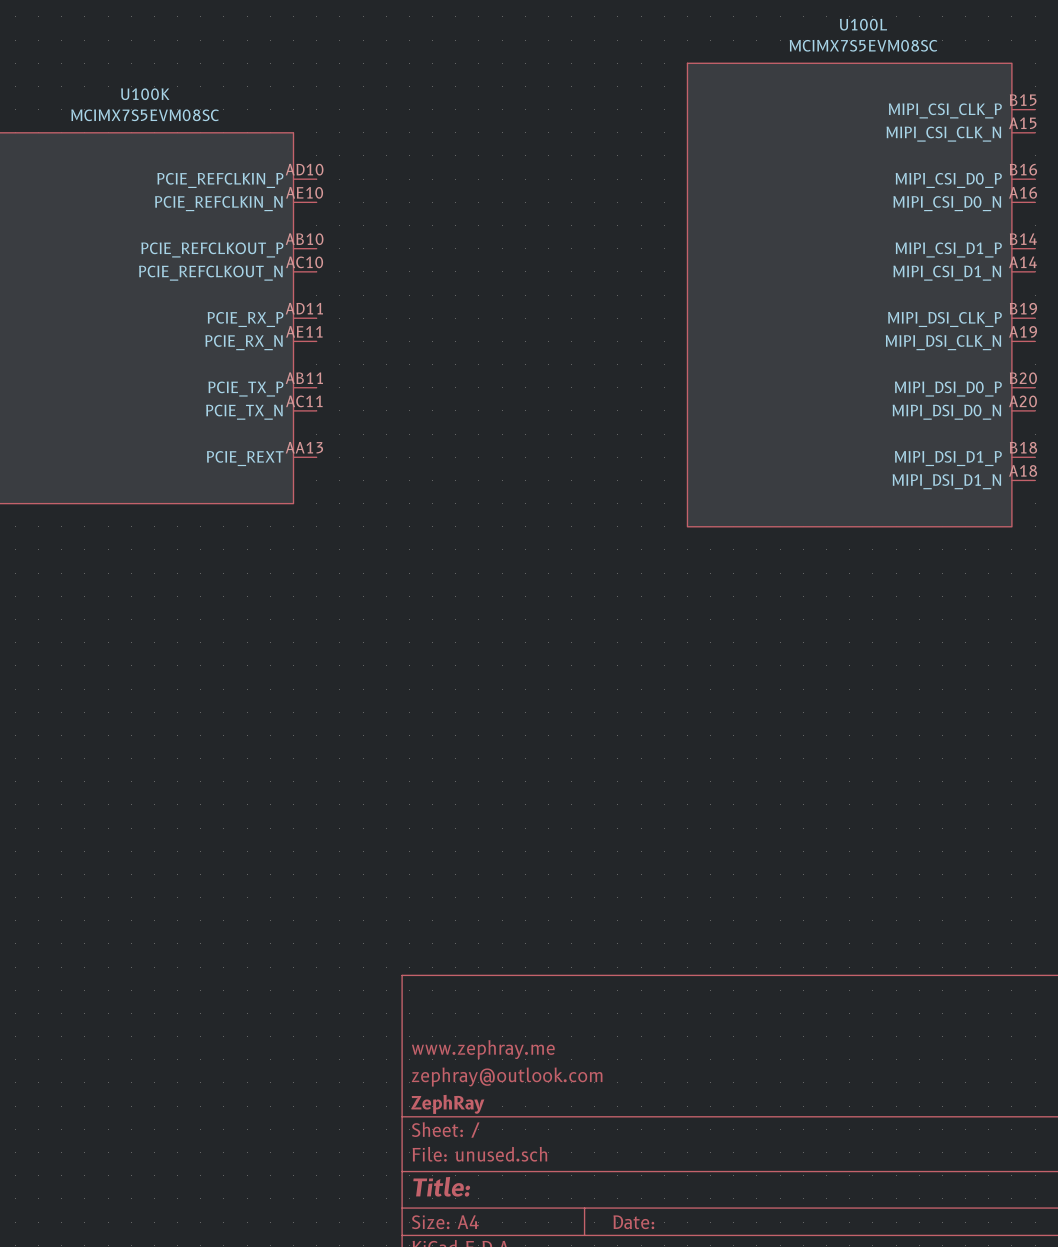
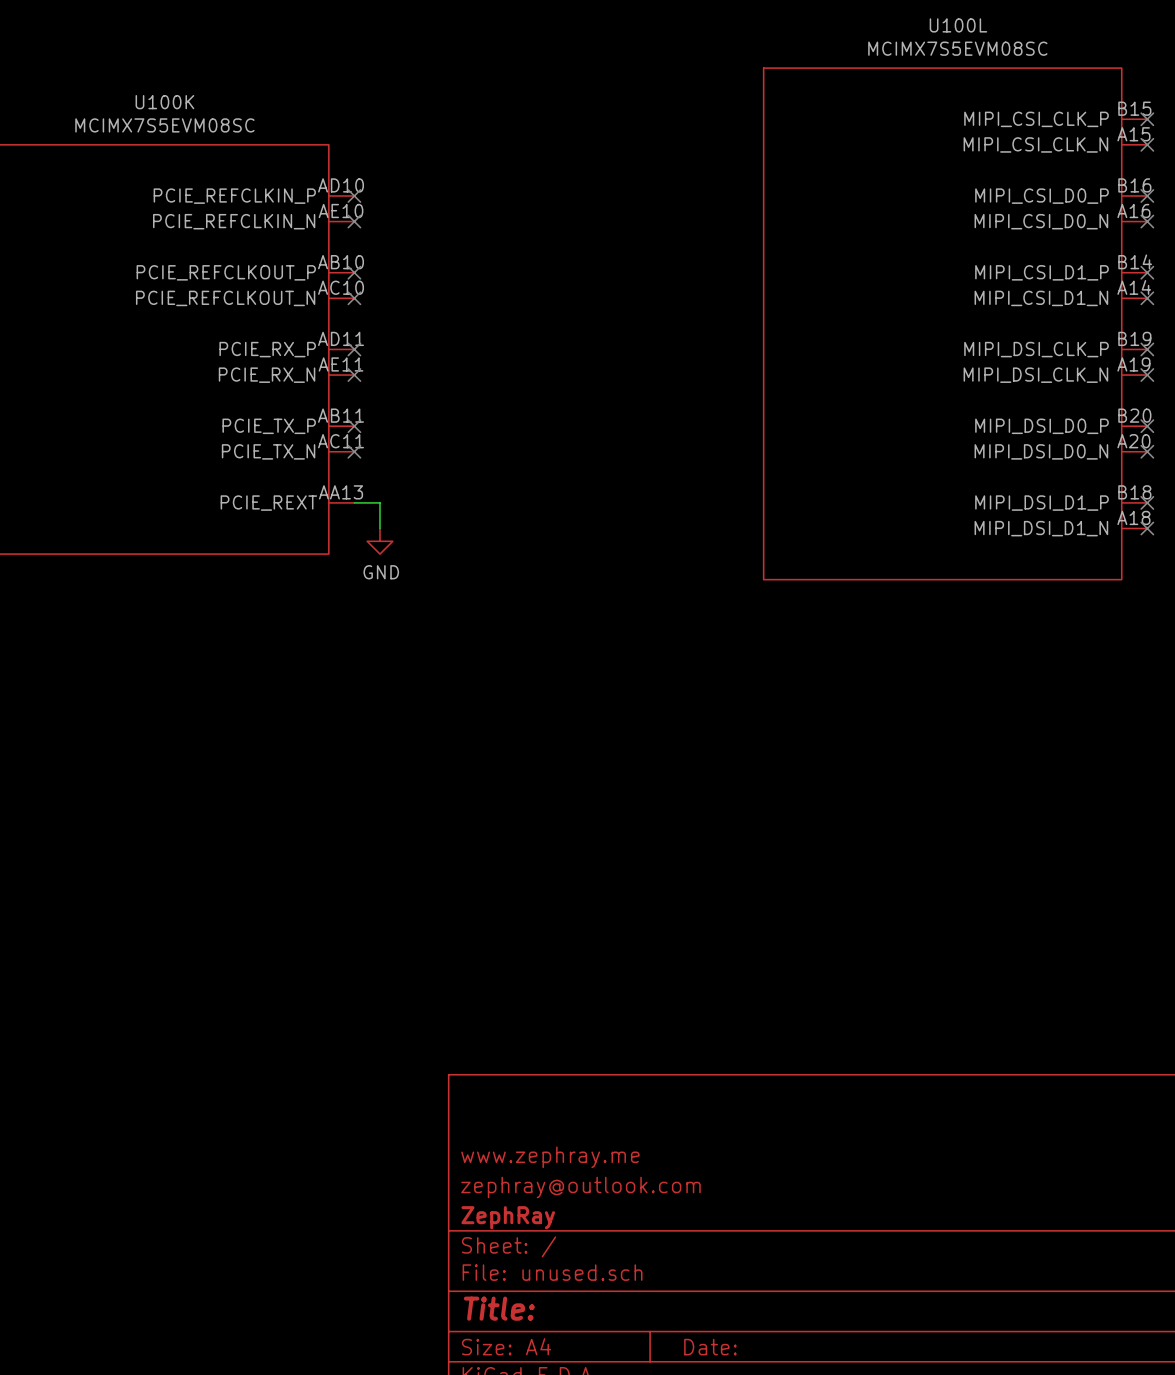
no-connect mark: none -> (1147, 119)
no-connect mark: none -> (1147, 144)
no-connect mark: none -> (354, 195)
no-connect mark: none -> (1147, 195)
no-connect mark: none -> (354, 221)
no-connect mark: none -> (1147, 221)
no-connect mark: none -> (354, 272)
no-connect mark: none -> (1147, 272)
no-connect mark: none -> (354, 298)
no-connect mark: none -> (1147, 298)
no-connect mark: none -> (354, 349)
no-connect mark: none -> (1147, 349)
no-connect mark: none -> (354, 375)
no-connect mark: none -> (1147, 375)
no-connect mark: none -> (354, 426)
no-connect mark: none -> (1147, 426)
no-connect mark: none -> (354, 451)
no-connect mark: none -> (1147, 451)
wire: none -> (354, 502) (379, 502) (379, 528)
no-connect mark: none -> (1147, 502)
no-connect mark: none -> (1147, 528)
power symbol: none -> GND (379, 541)

